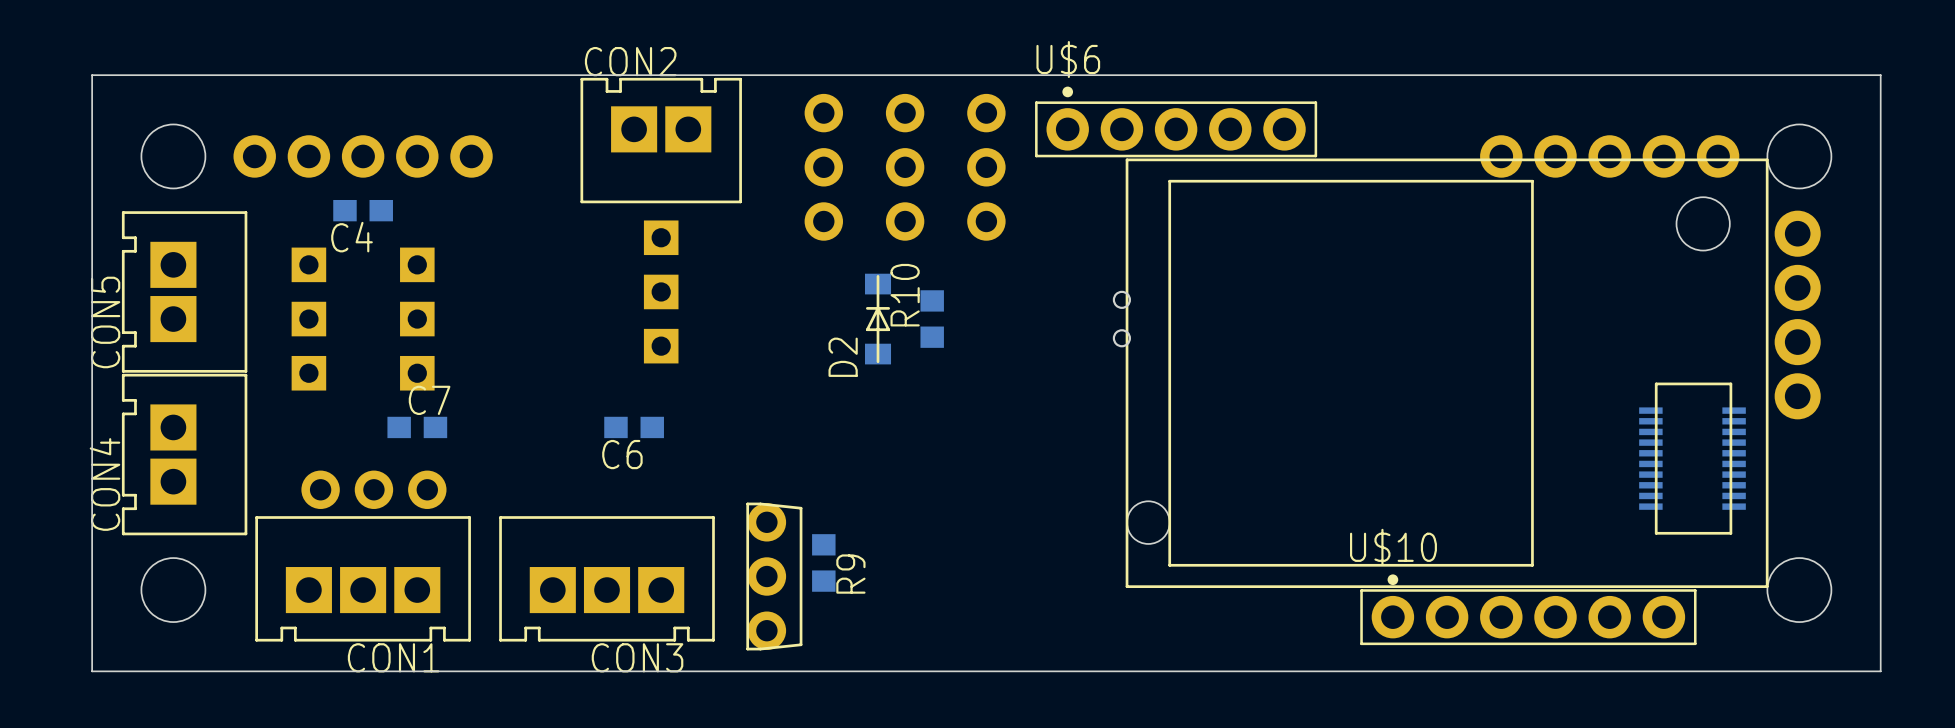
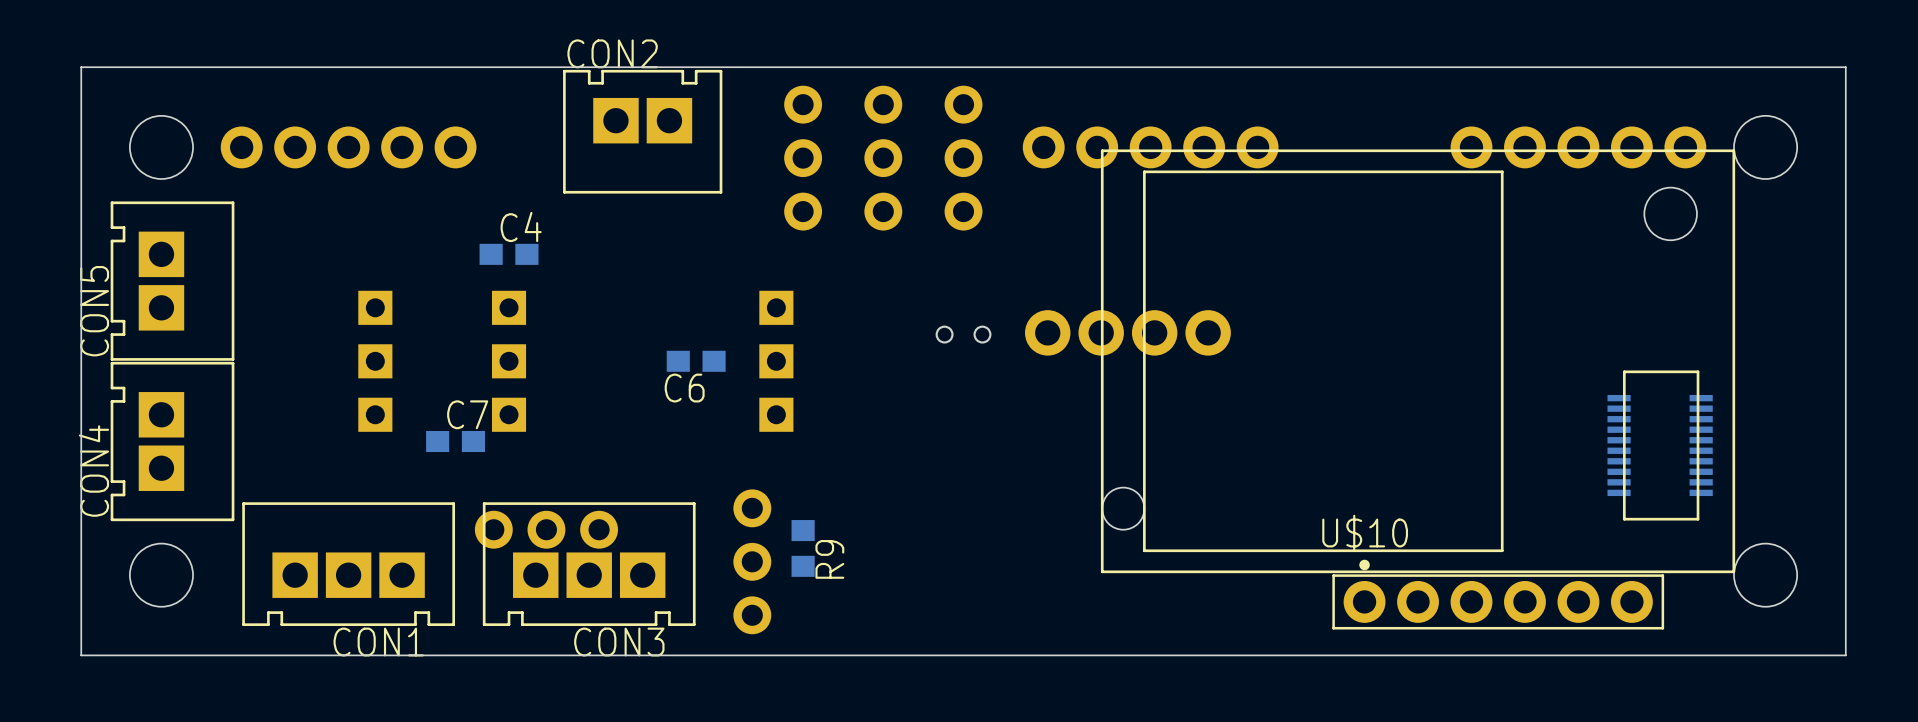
U$6 side: bottom (1176, 121) -> top (1150, 147)
C4 position: (363, 210) -> (509, 254)
C4 name position: C4 (352, 237) -> C4 (521, 226)
part: (661, 291) -> none
part: (1797, 315) -> none
part: (308, 319) -> none
part: (417, 319) -> none
D2: (878, 319) -> none
R10: (932, 319) -> none
part rotation: 0° (1121, 319) -> 90° clockwise (963, 334)
part position: (1121, 319) -> (963, 334)
part: none -> (1127, 332)
part: none -> (375, 361)
part: none -> (509, 361)
part: none -> (776, 361)
C7 position: (417, 427) -> (455, 441)
C6 position: (634, 427) -> (696, 361)
part position: (373, 489) -> (546, 529)
part side: bottom (774, 576) -> top (752, 561)

